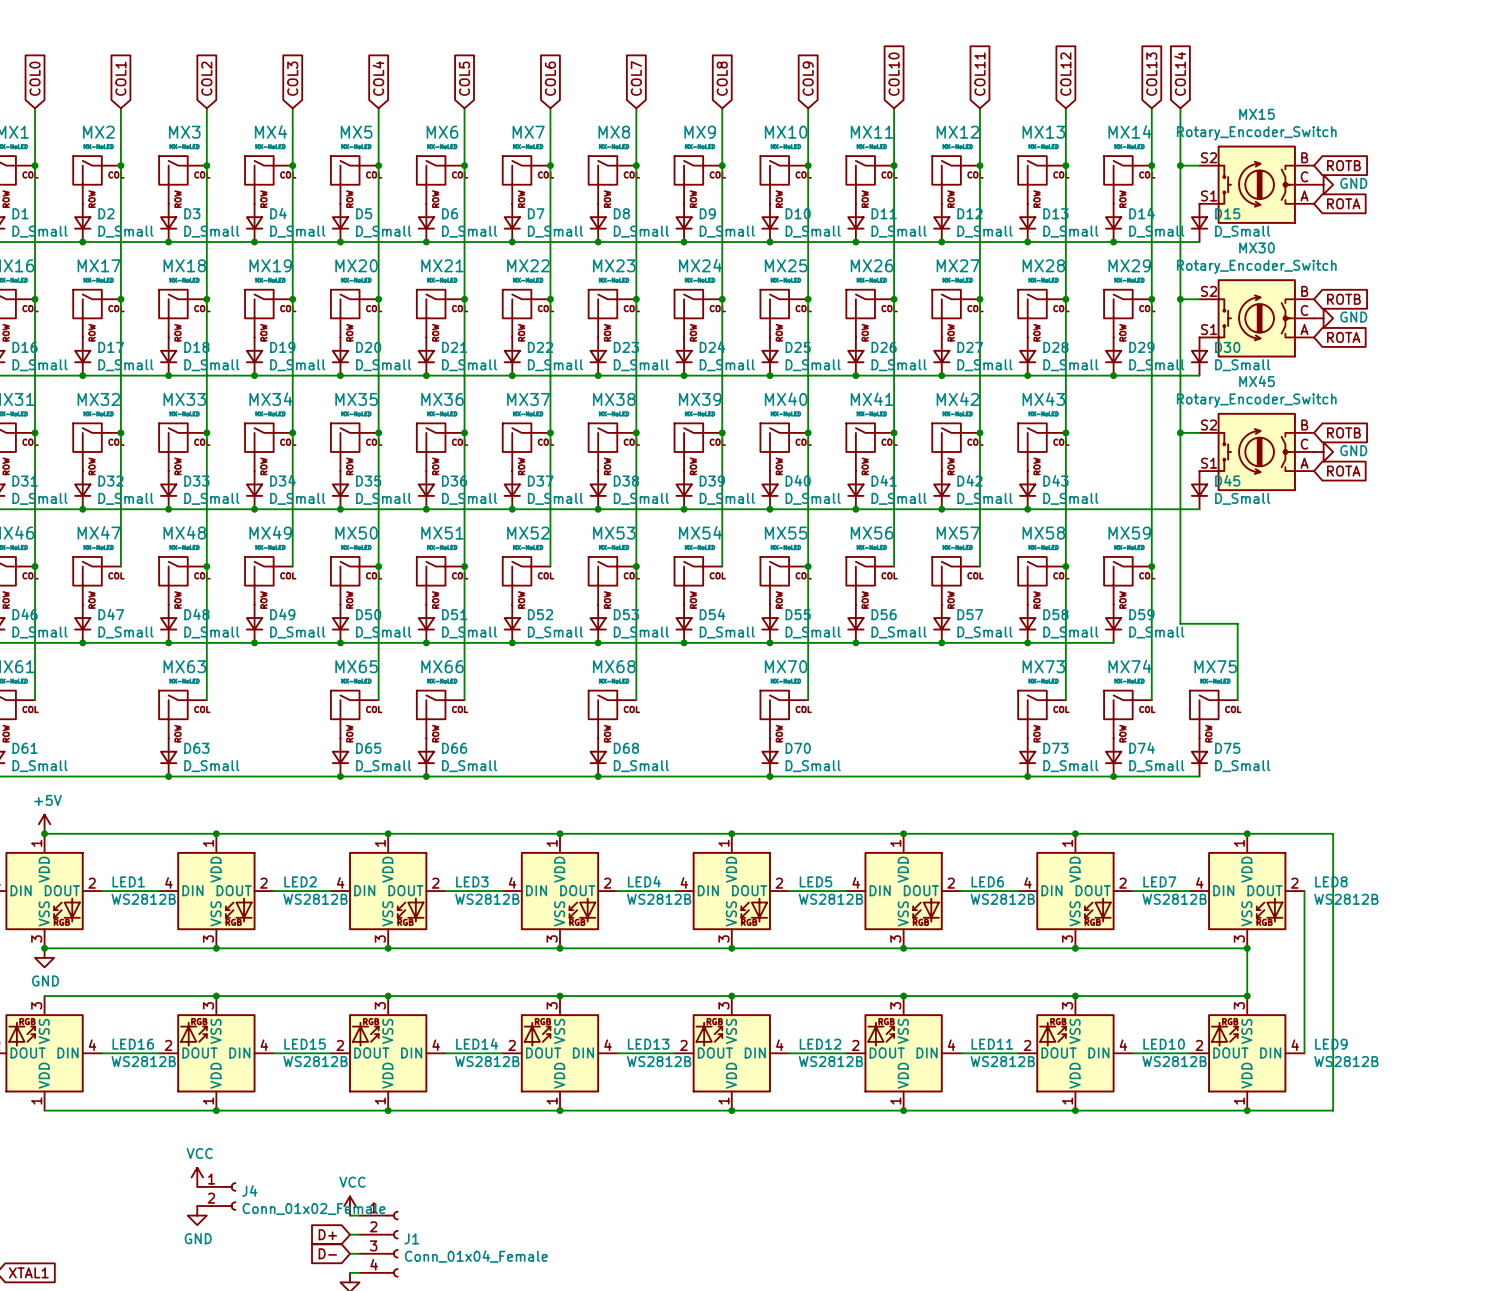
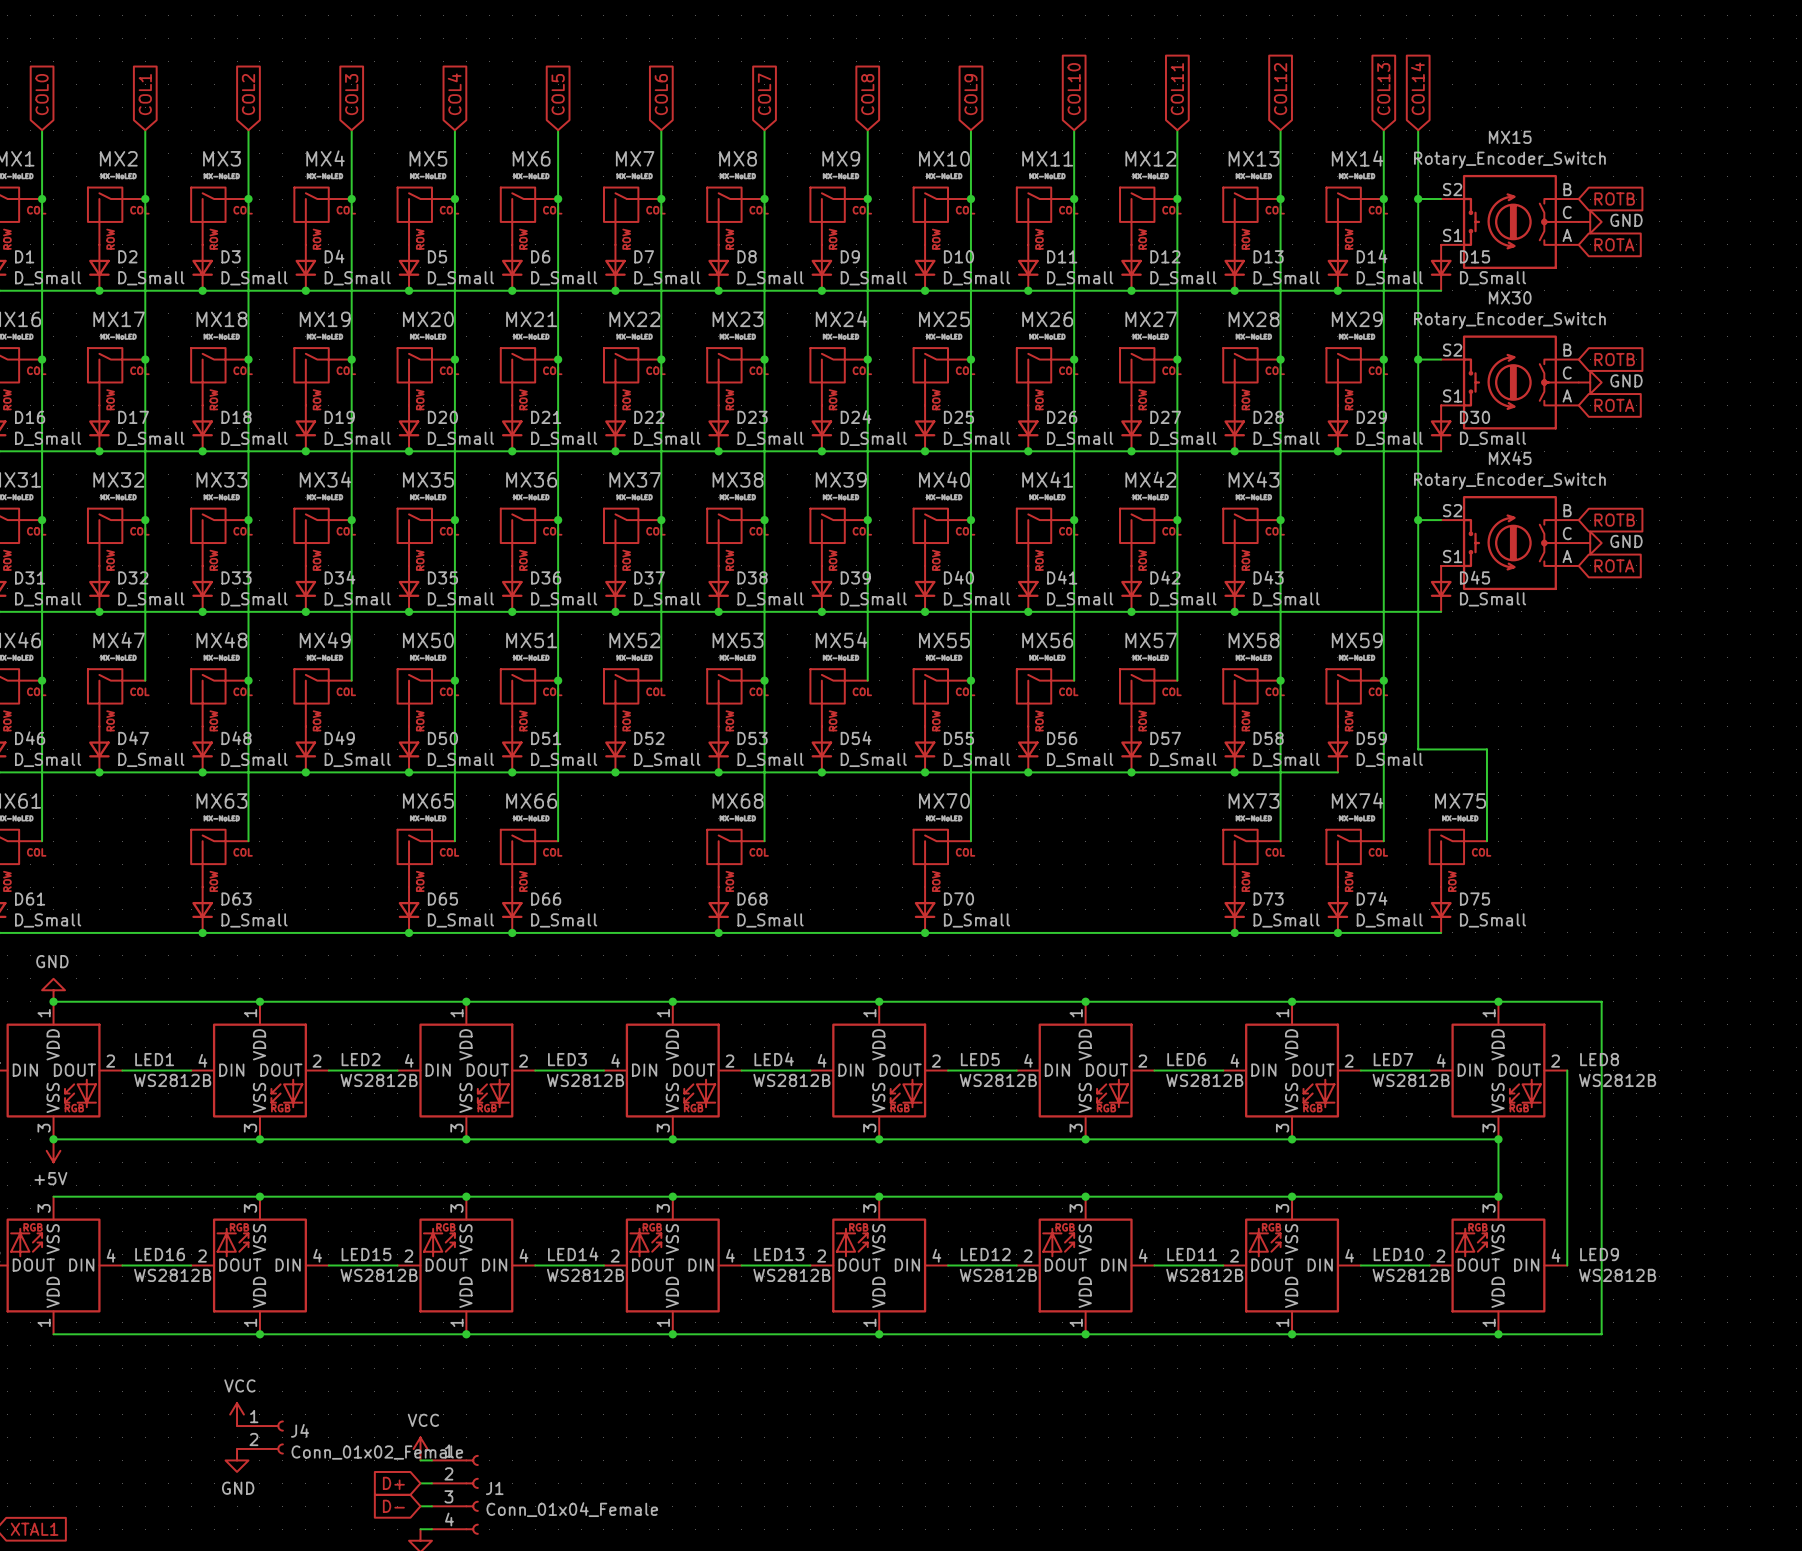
power symbol: +5V (44, 824) -> GND (53, 990)
power symbol: GND (44, 957) -> +5V (53, 1150)

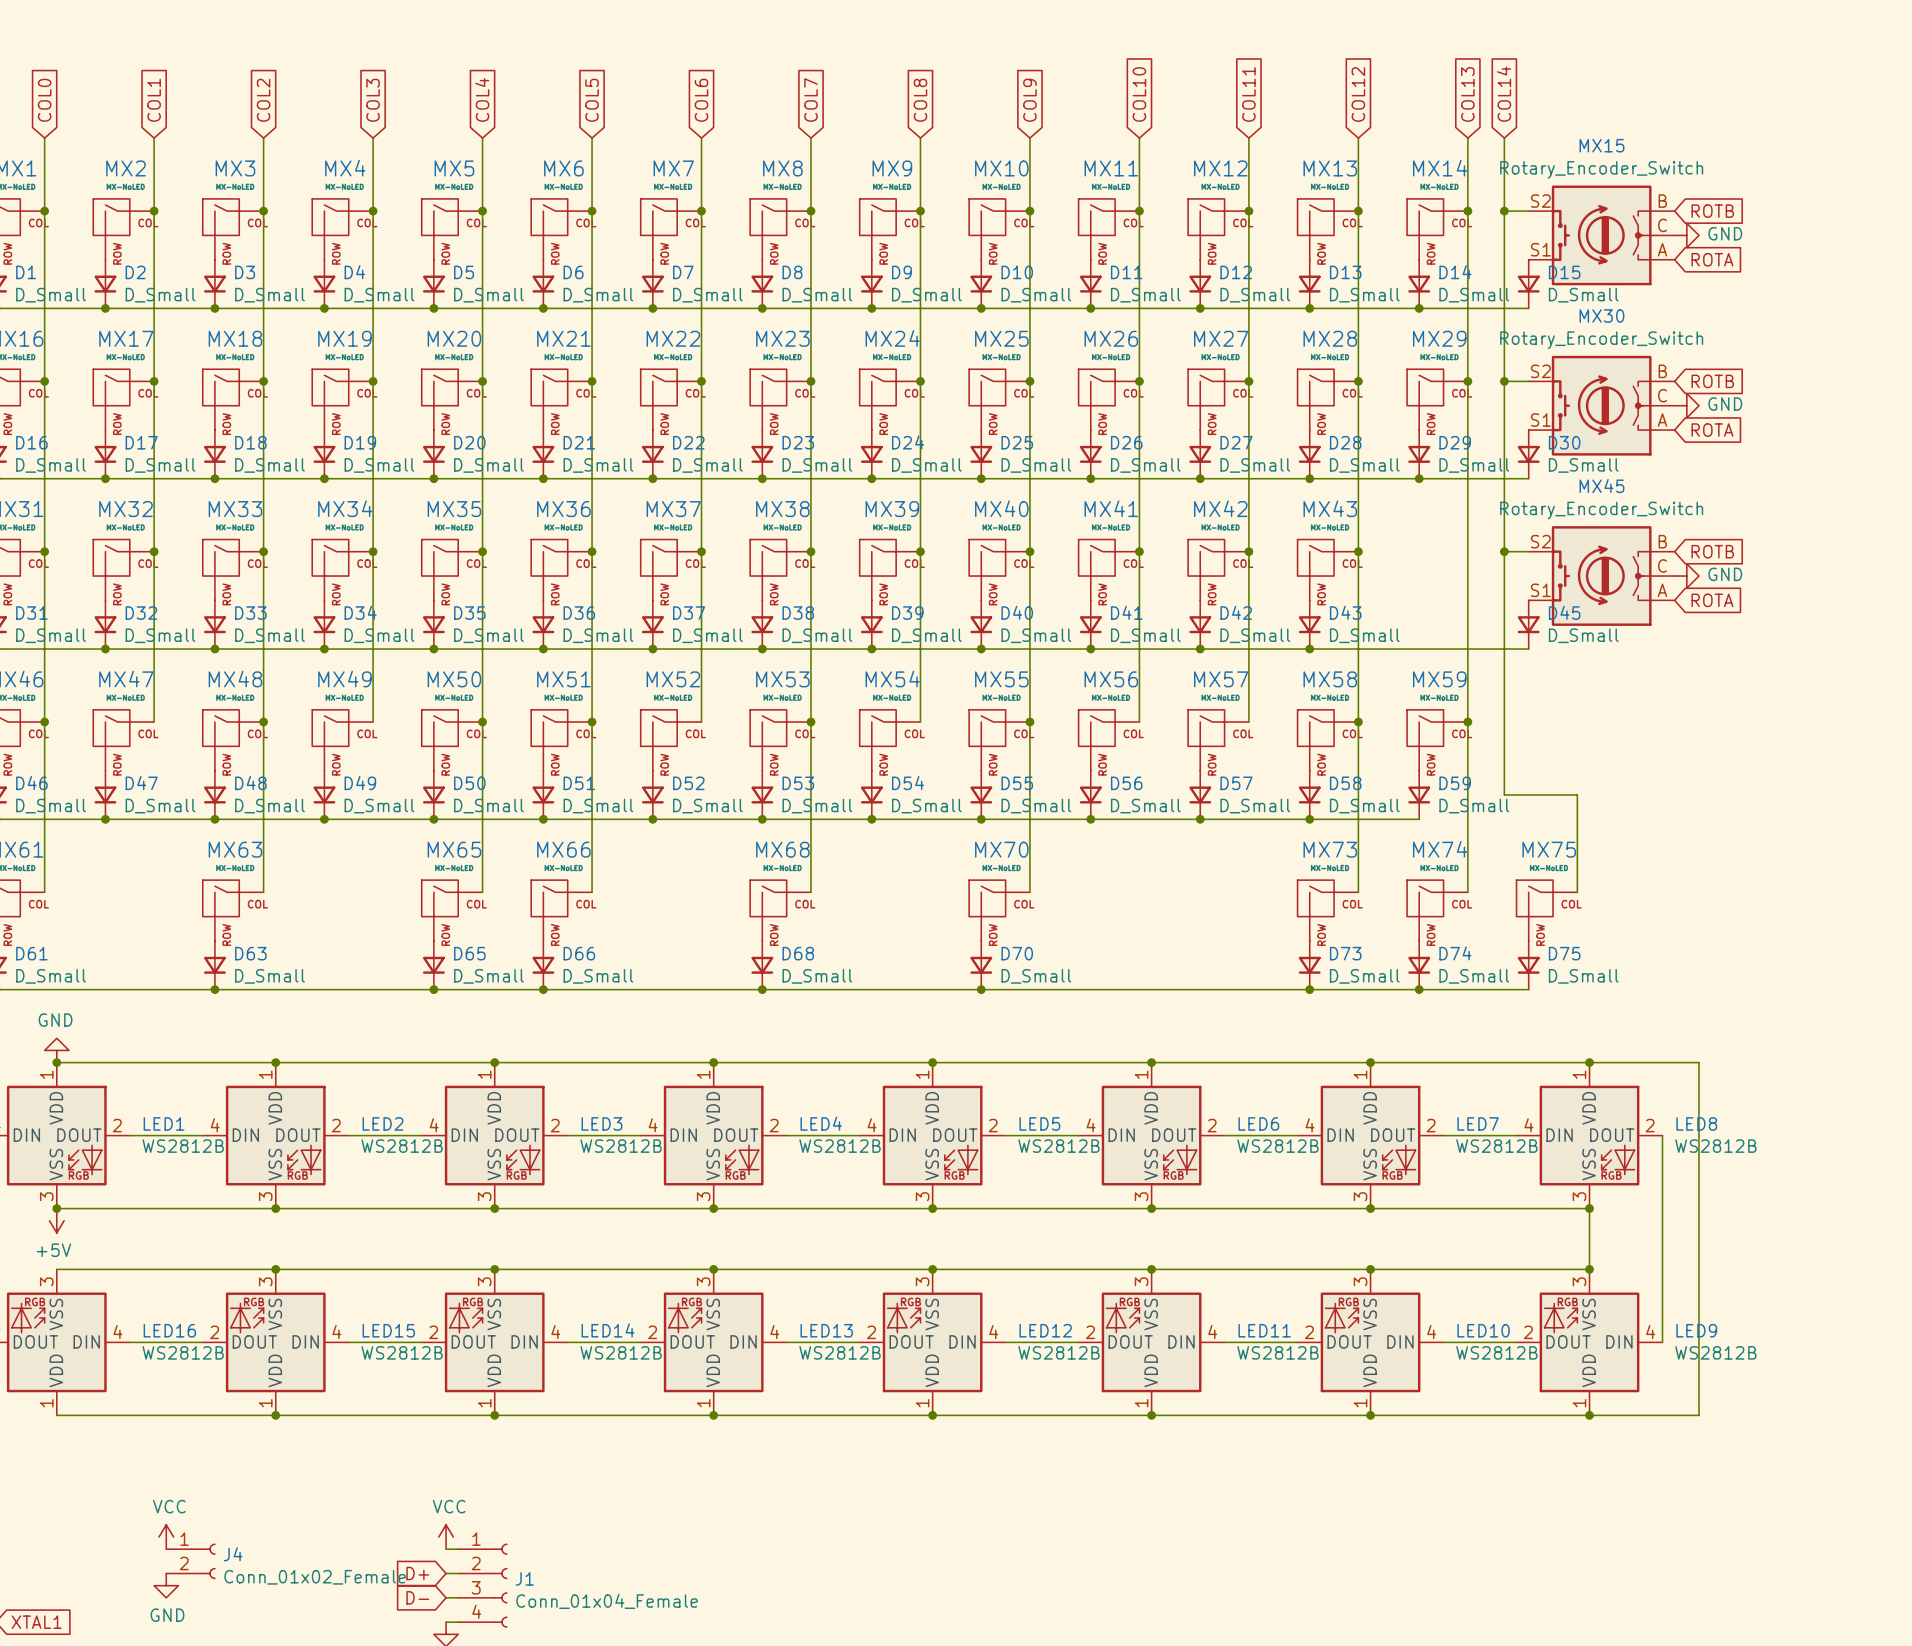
power symbol position: VCC (237, 1414) -> VCC (166, 1537)
J4 position: (260, 1437) -> (190, 1561)
power symbol position: GND (237, 1460) -> GND (166, 1585)

